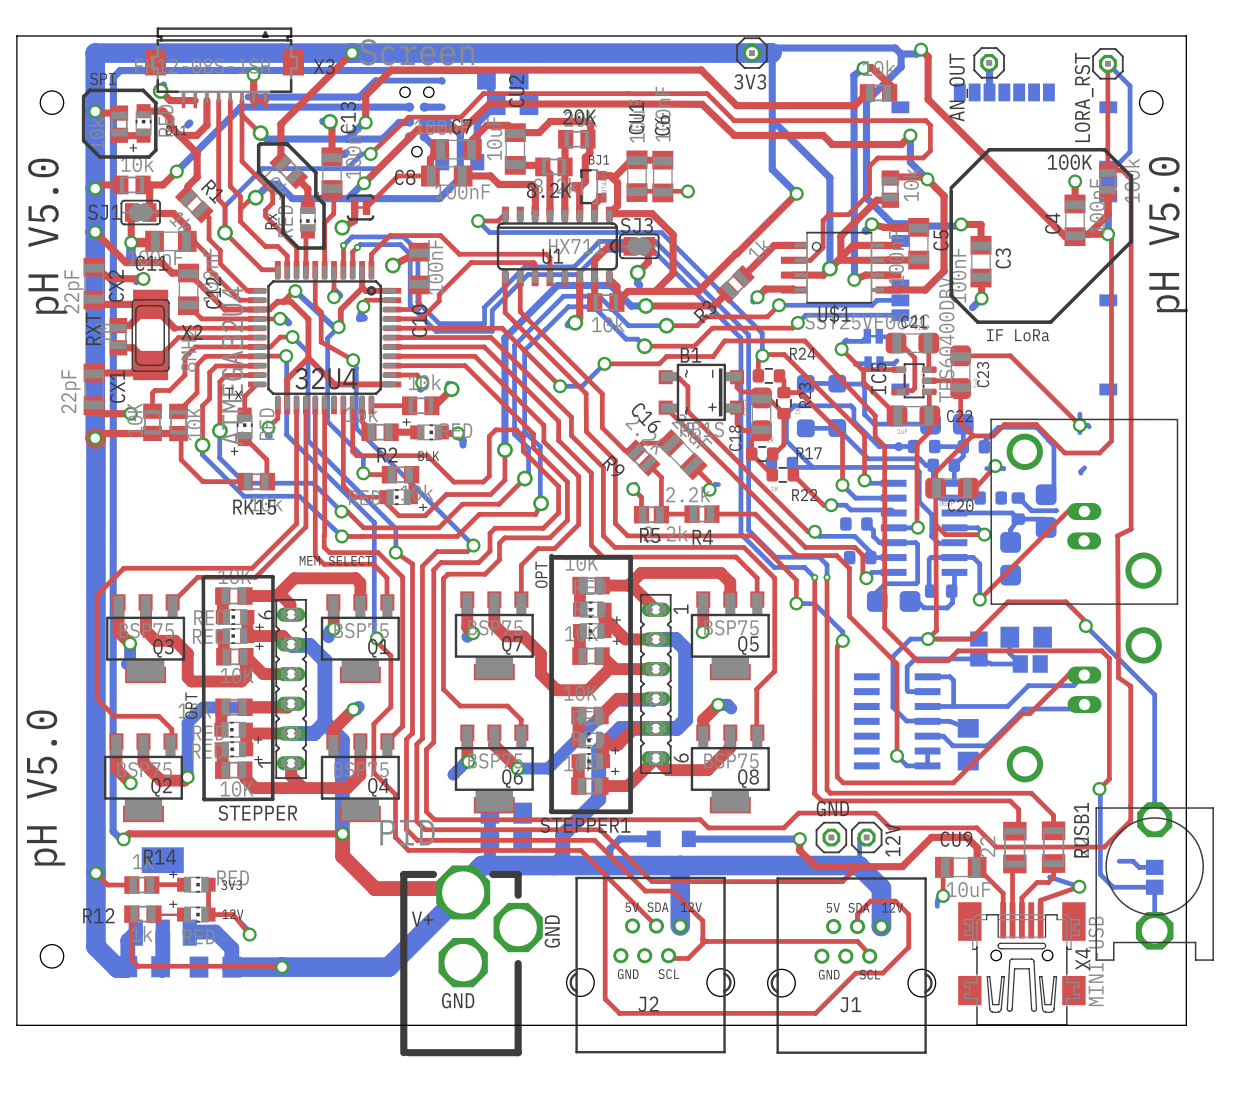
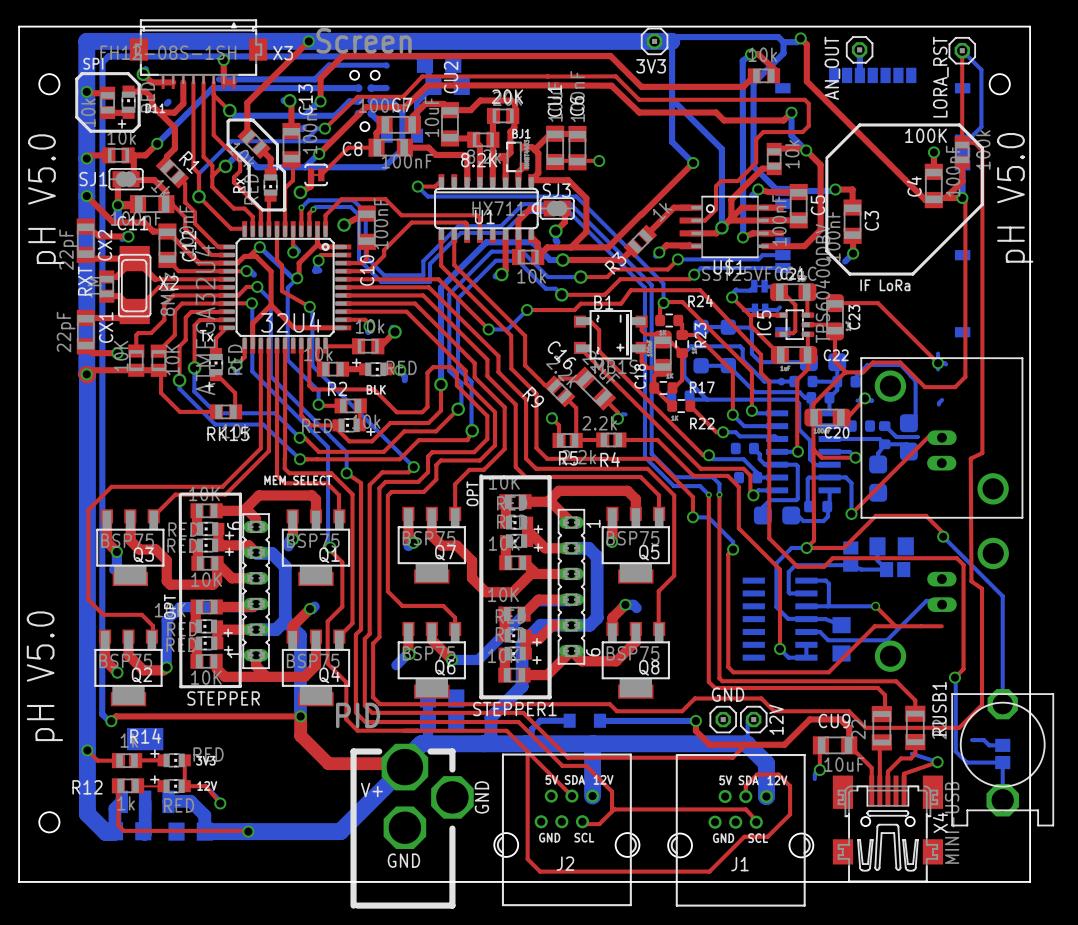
top track: (1084, 675) (1068, 674) (1029, 713) (1022, 713) (1006, 729) -> (941, 626) (874, 626)
bottom track: (1084, 675) (1073, 685) (1028, 685) (1007, 706) -> none
bottom track: (1084, 704) (1080, 709) (1024, 709) (987, 745) -> (941, 600) (926, 600) (887, 640) (858, 640)
top track: none -> (875, 606) (895, 626)
via: none -> (875, 606)

